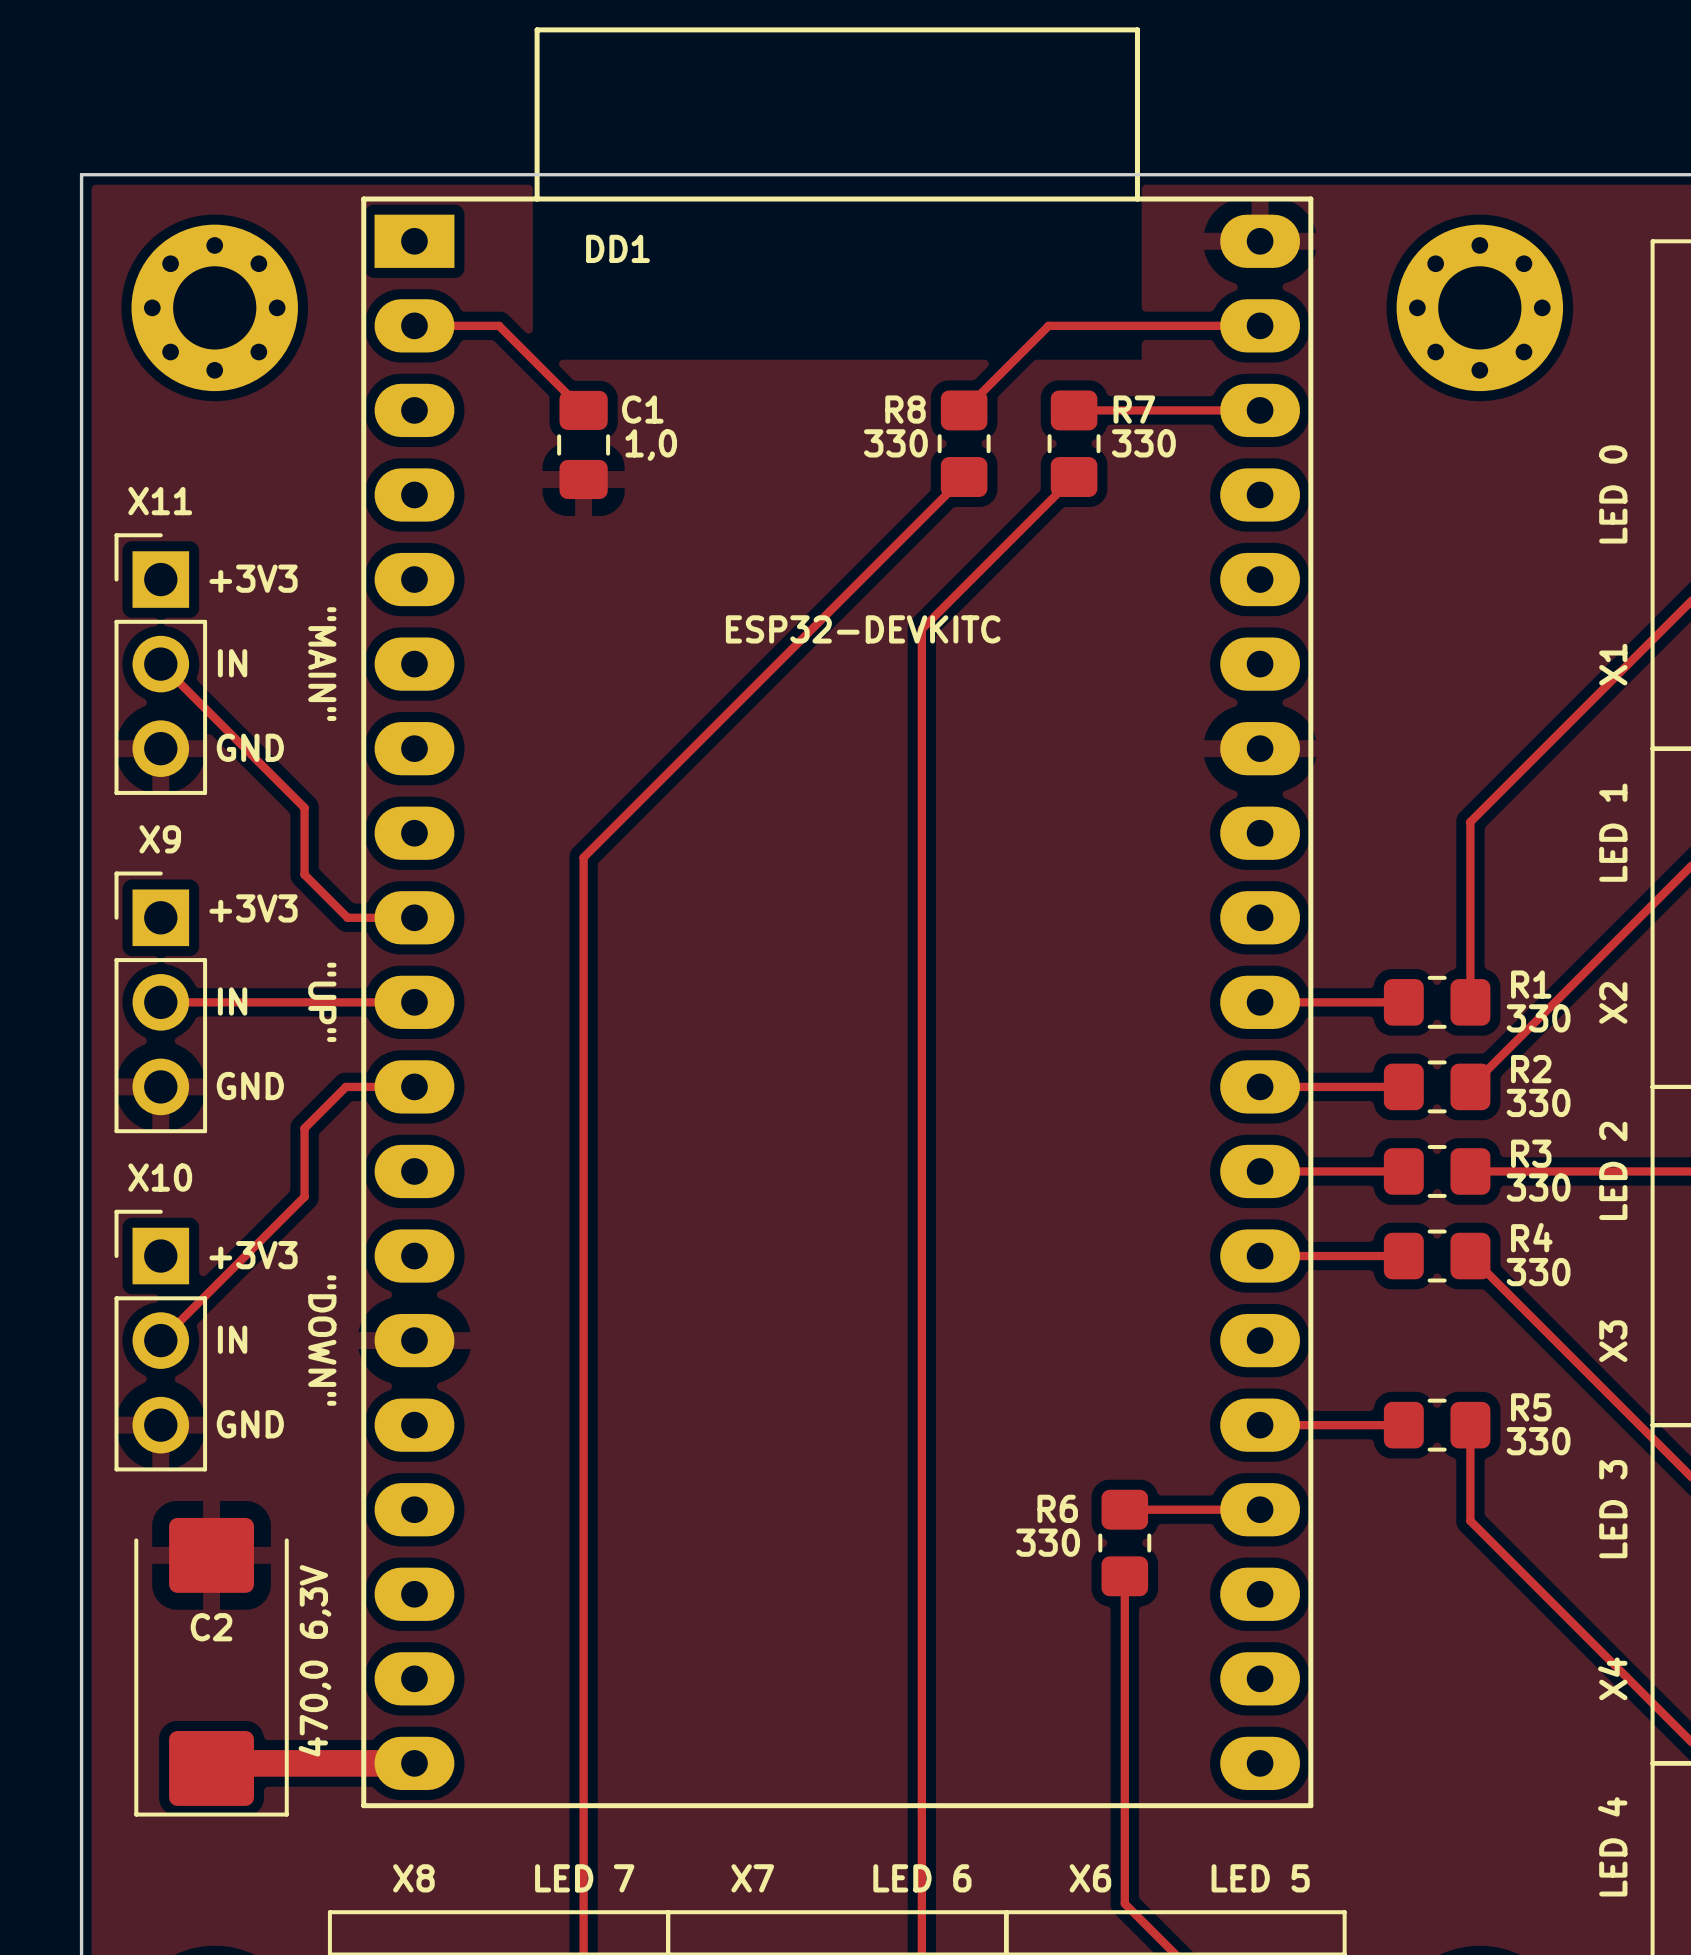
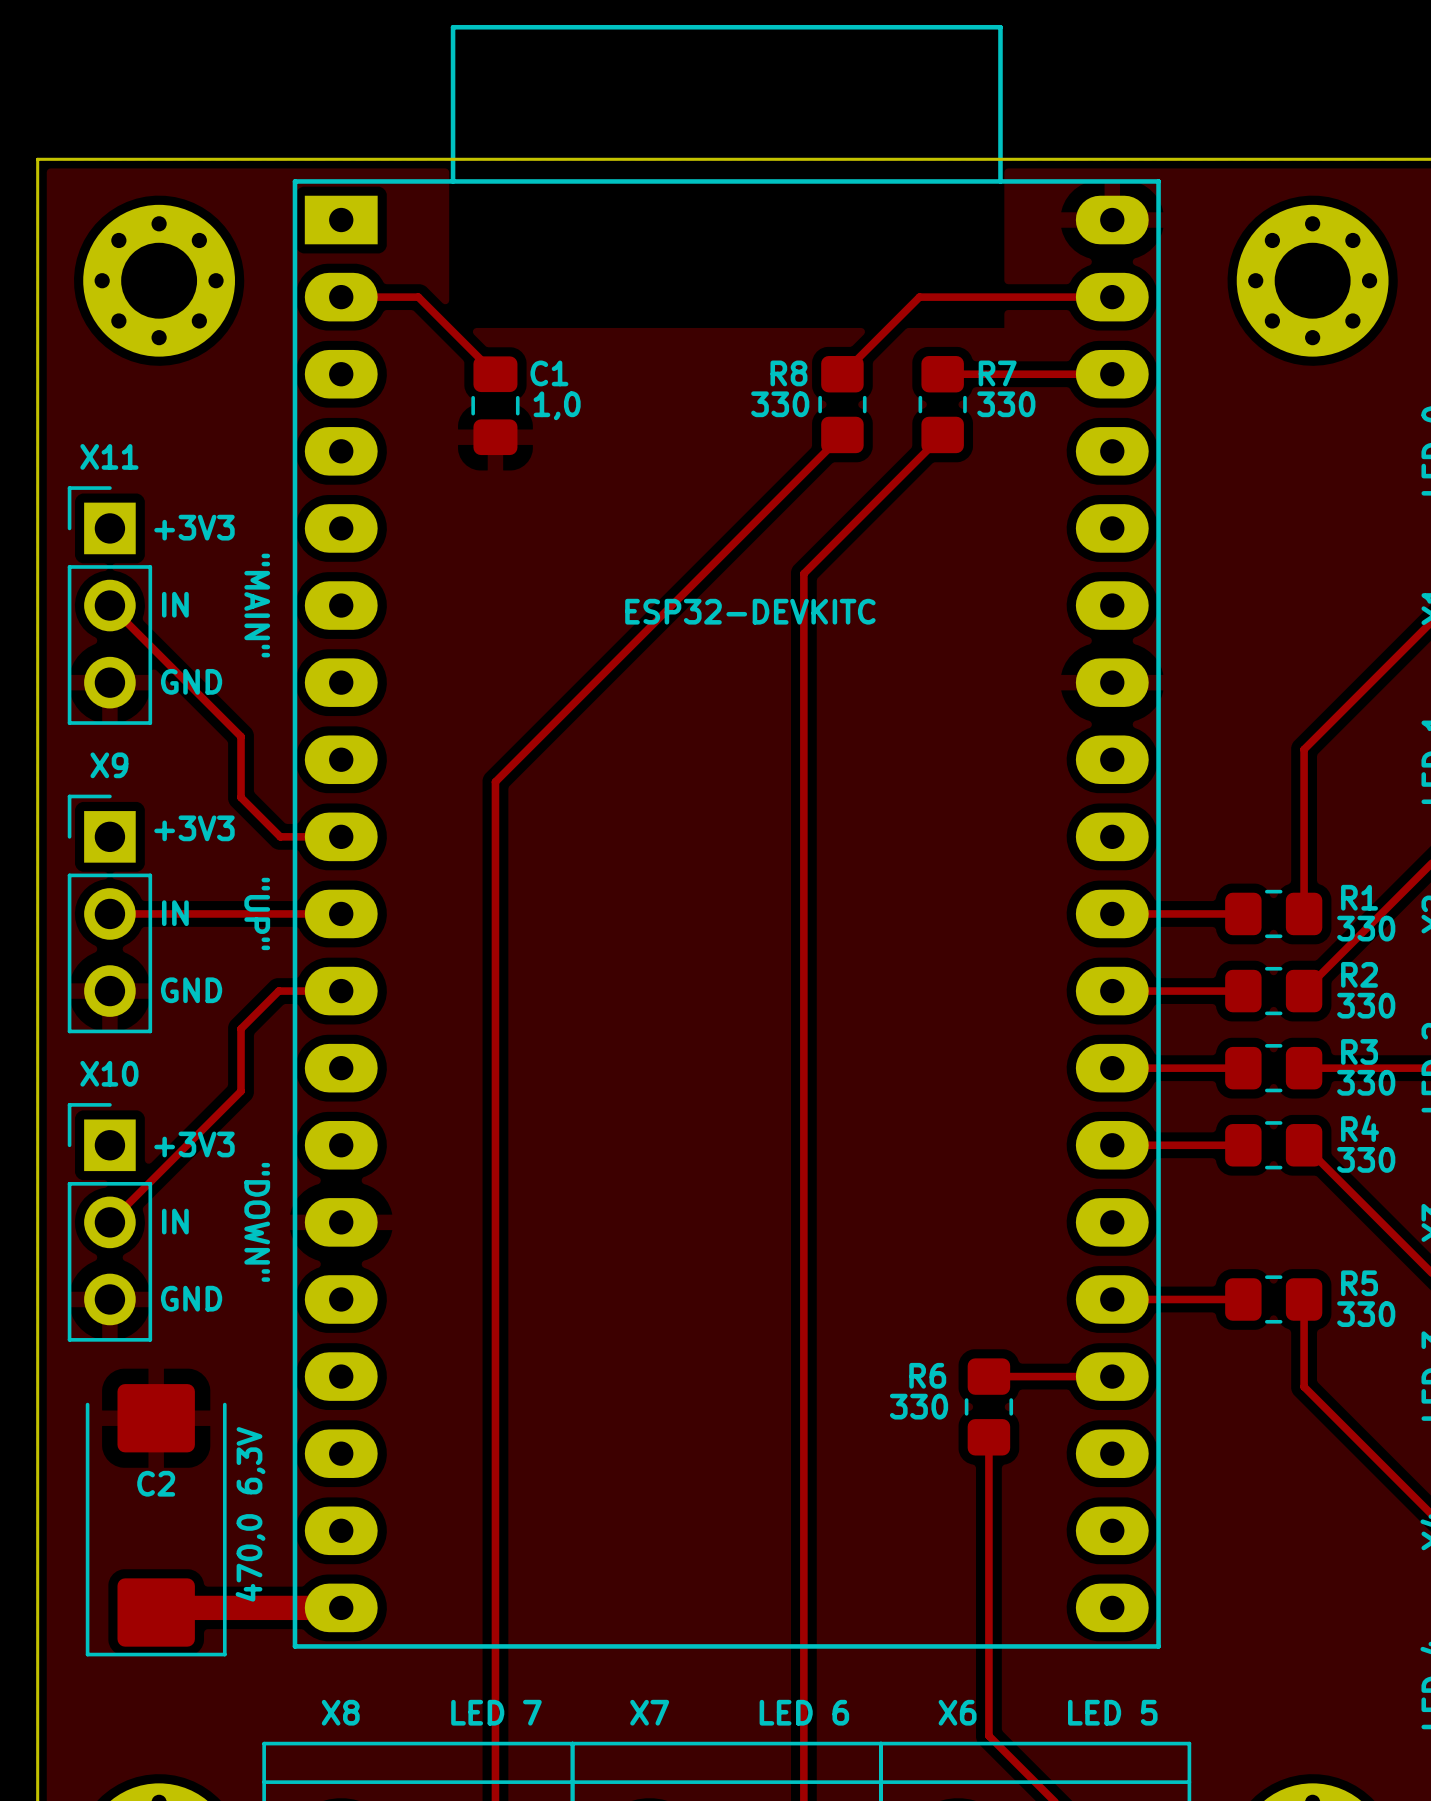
DD1 name: DD1 (617, 248) -> none
DD1 value position: ESP32-DEVKITC (863, 629) -> ESP32-DEVKITC (750, 611)

